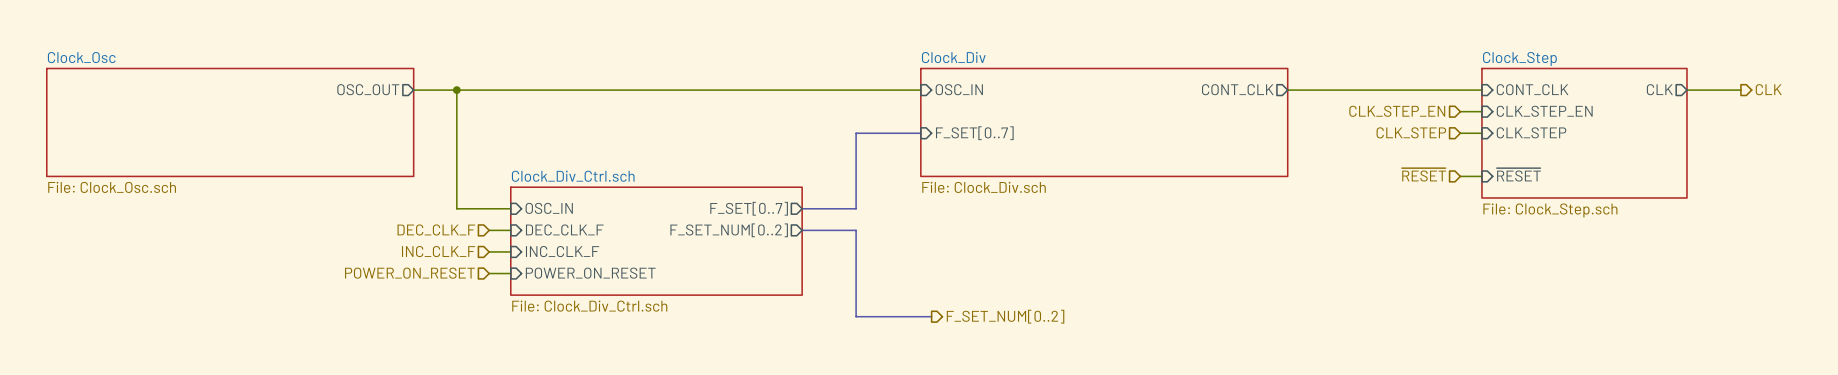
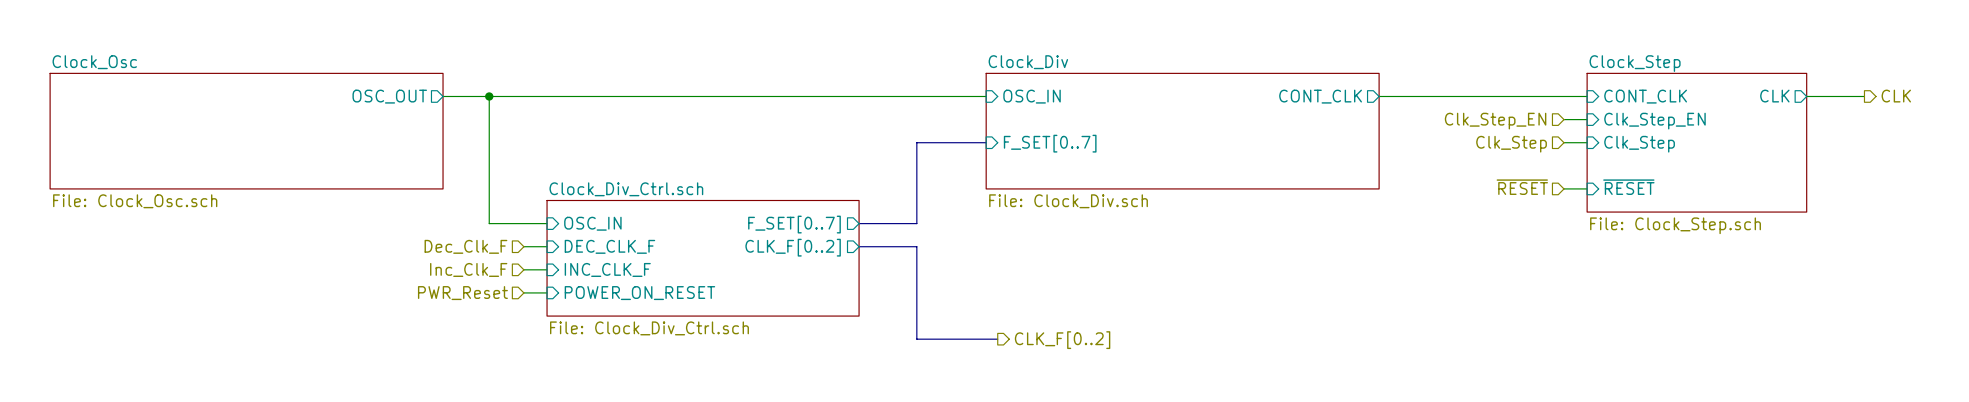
hierarchical label: CLK_STEP_EN (1397, 111) -> Clk_Step_EN (1495, 121)
sheet pin: CLK_STEP_EN (1544, 111) -> Clk_Step_EN (1654, 121)
hierarchical label: CLK_STEP (1411, 132) -> Clk_Step (1511, 144)
sheet pin: CLK_STEP (1531, 132) -> Clk_Step (1639, 144)
hierarchical label: DEC_CLK_F (436, 229) -> Dec_Clk_F (465, 246)
sheet pin: F_SET_NUM[0..2] (729, 230) -> CLK_F[0..2] (793, 247)
hierarchical label: INC_CLK_F (438, 251) -> Inc_Clk_F (468, 269)
hierarchical label: POWER_ON_RESET (409, 273) -> PWR_Reset (462, 293)
hierarchical label: F_SET_NUM[0..2] (1005, 316) -> CLK_F[0..2] (1062, 340)

